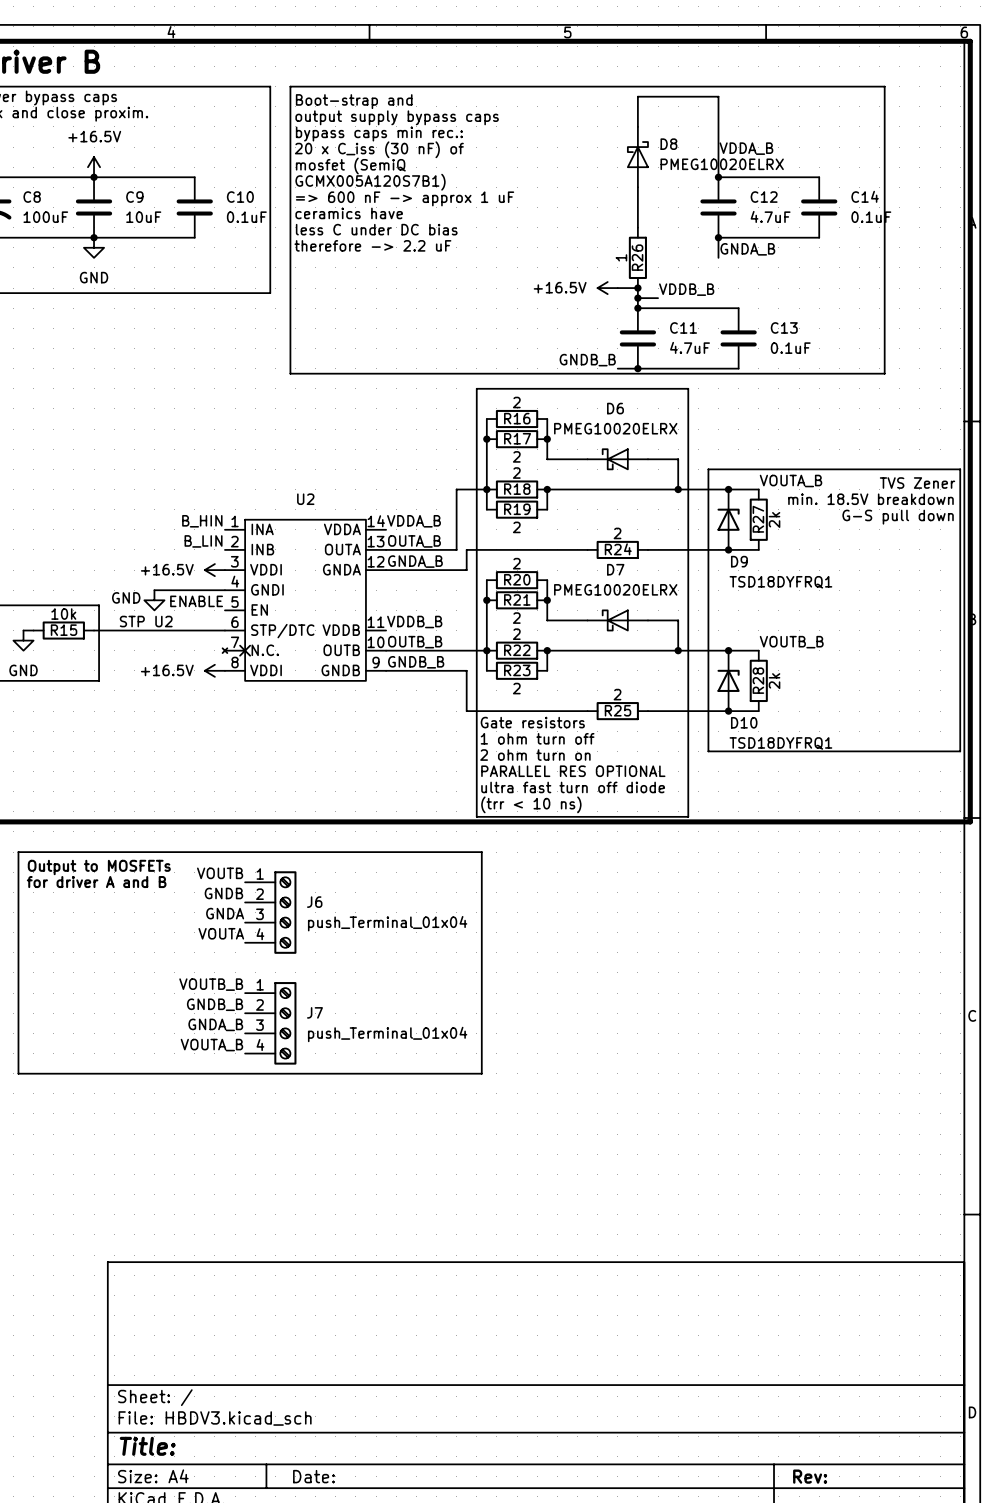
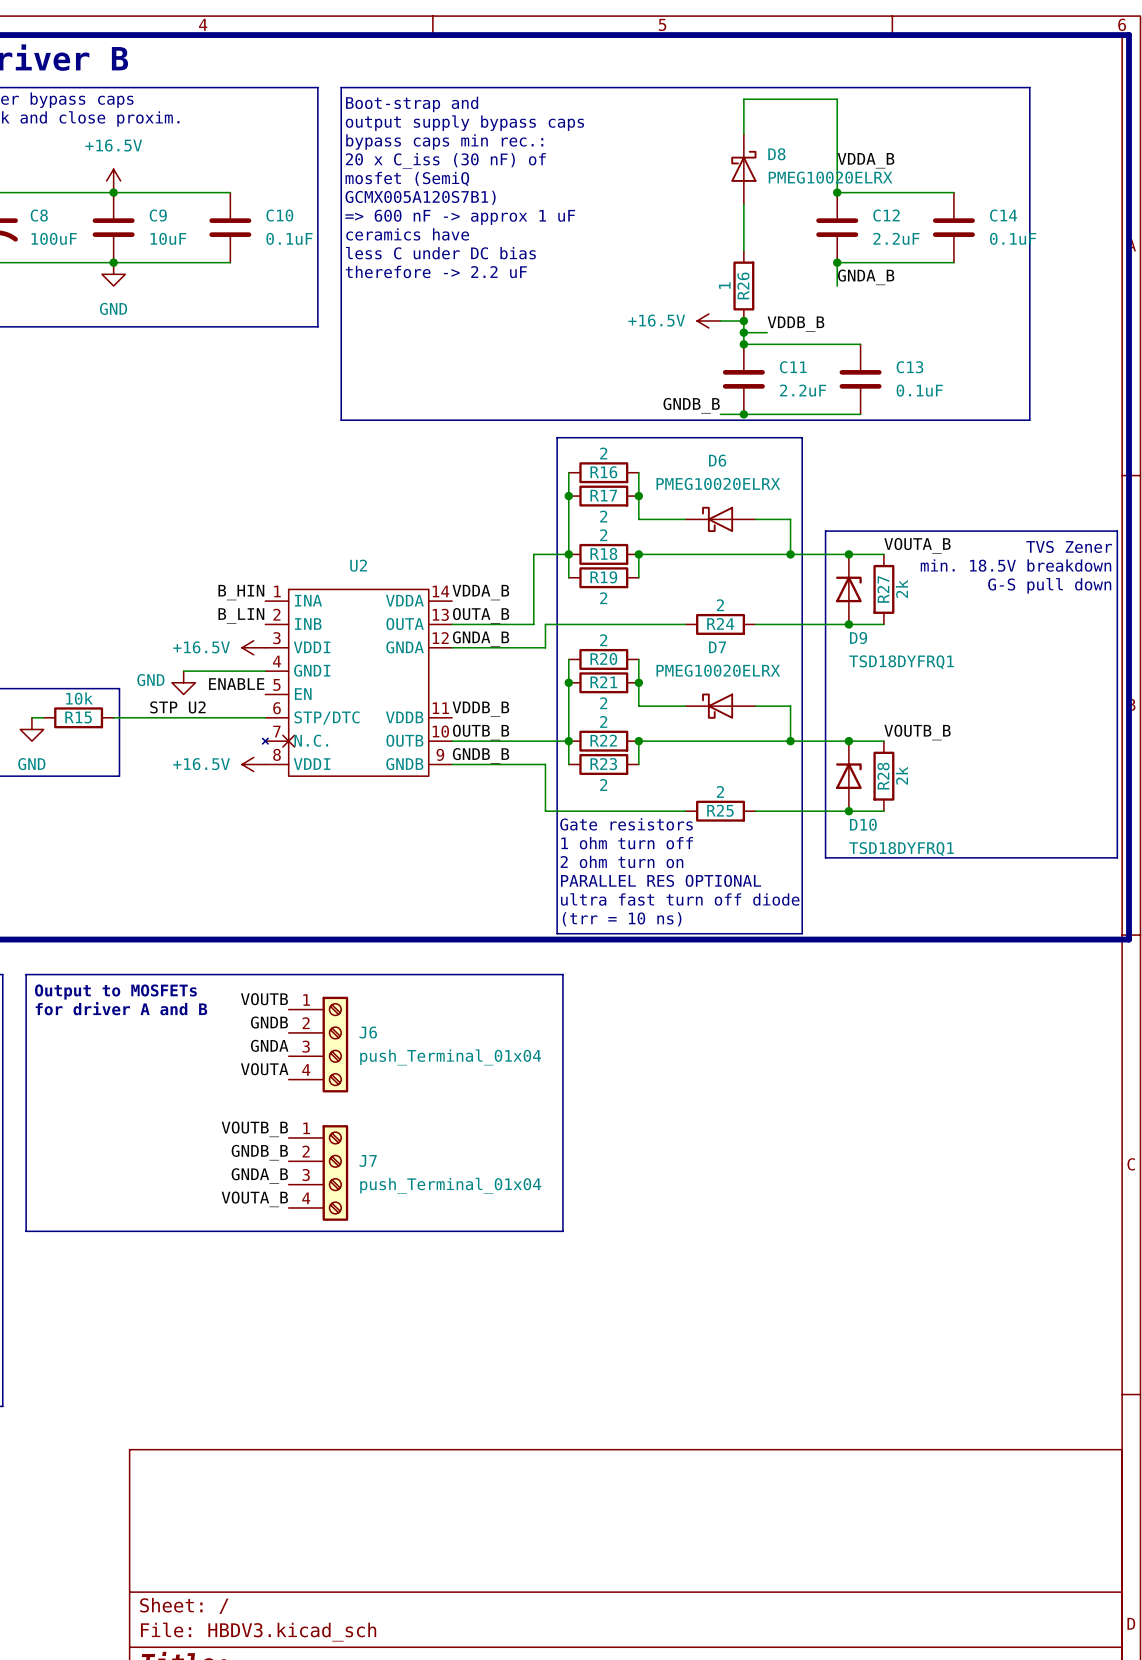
C12 value: 4.7uF (770, 216) -> 2.2uF (896, 238)
C11 value: 4.7uF (690, 347) -> 2.2uF (803, 390)
text: (trr < 10 ns) (531, 804) -> (trr = 10 ns) (622, 919)

